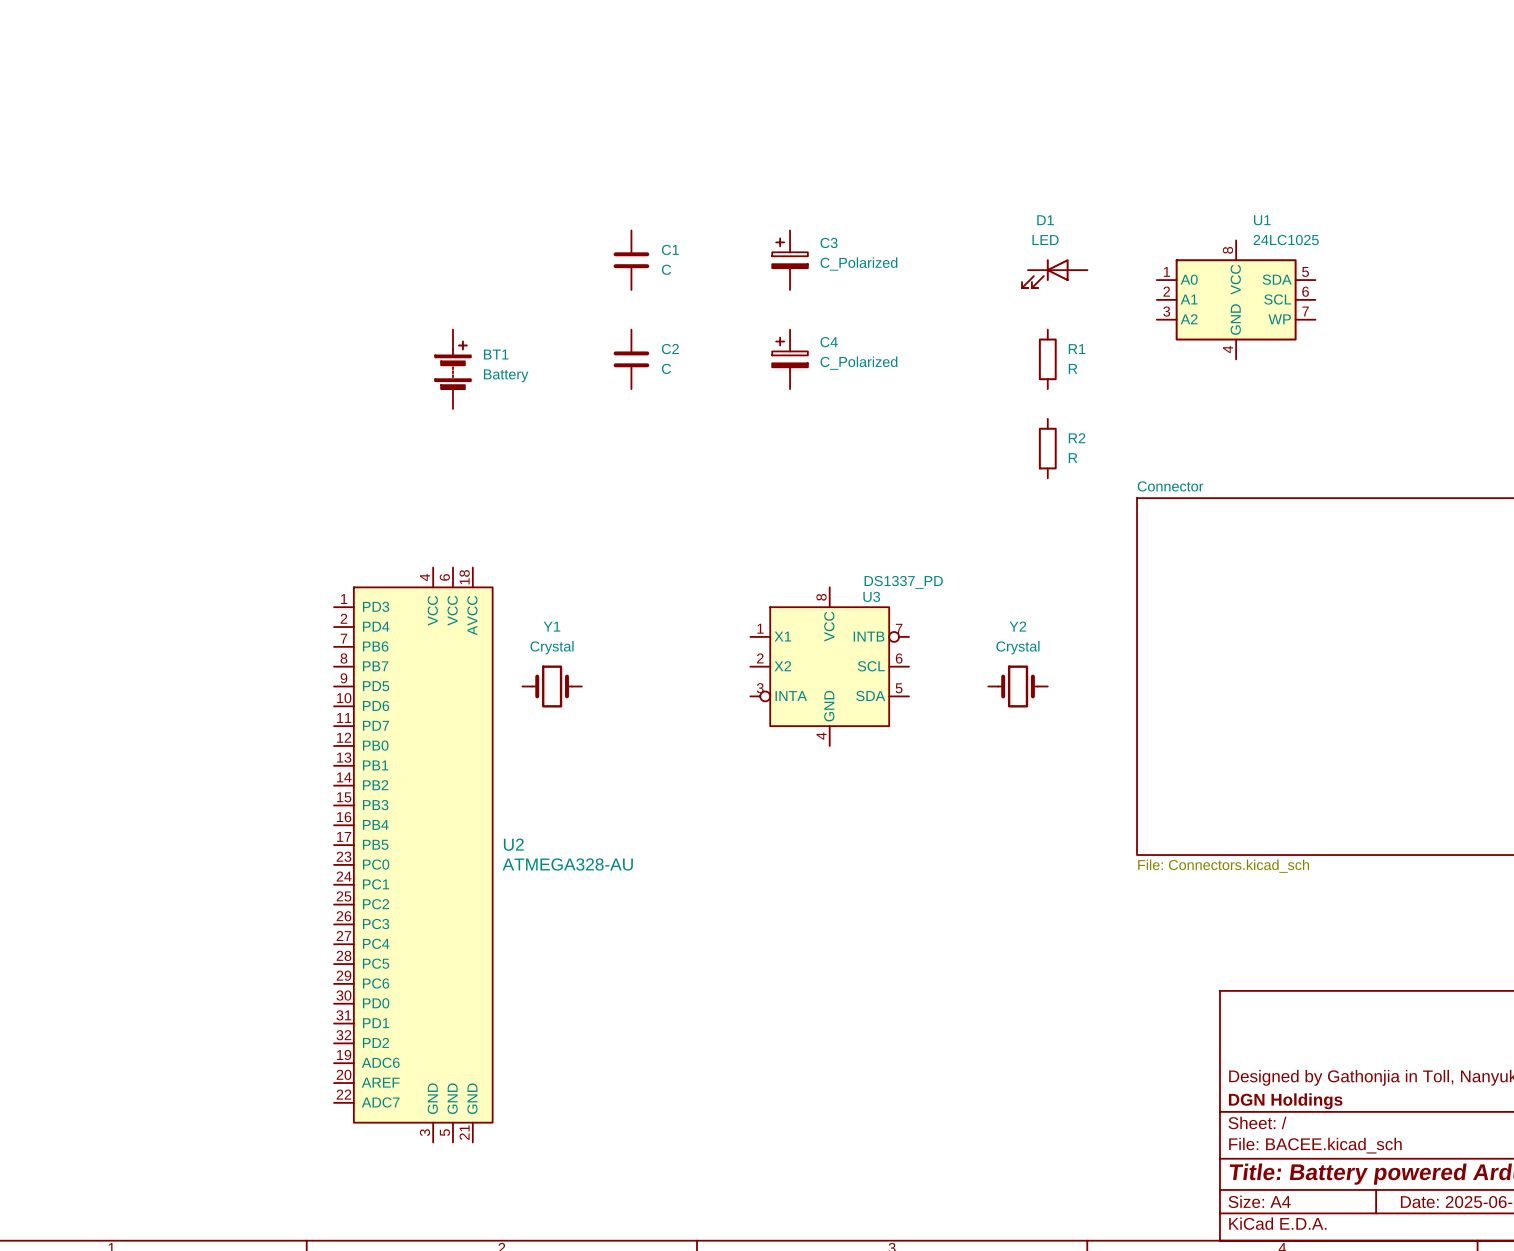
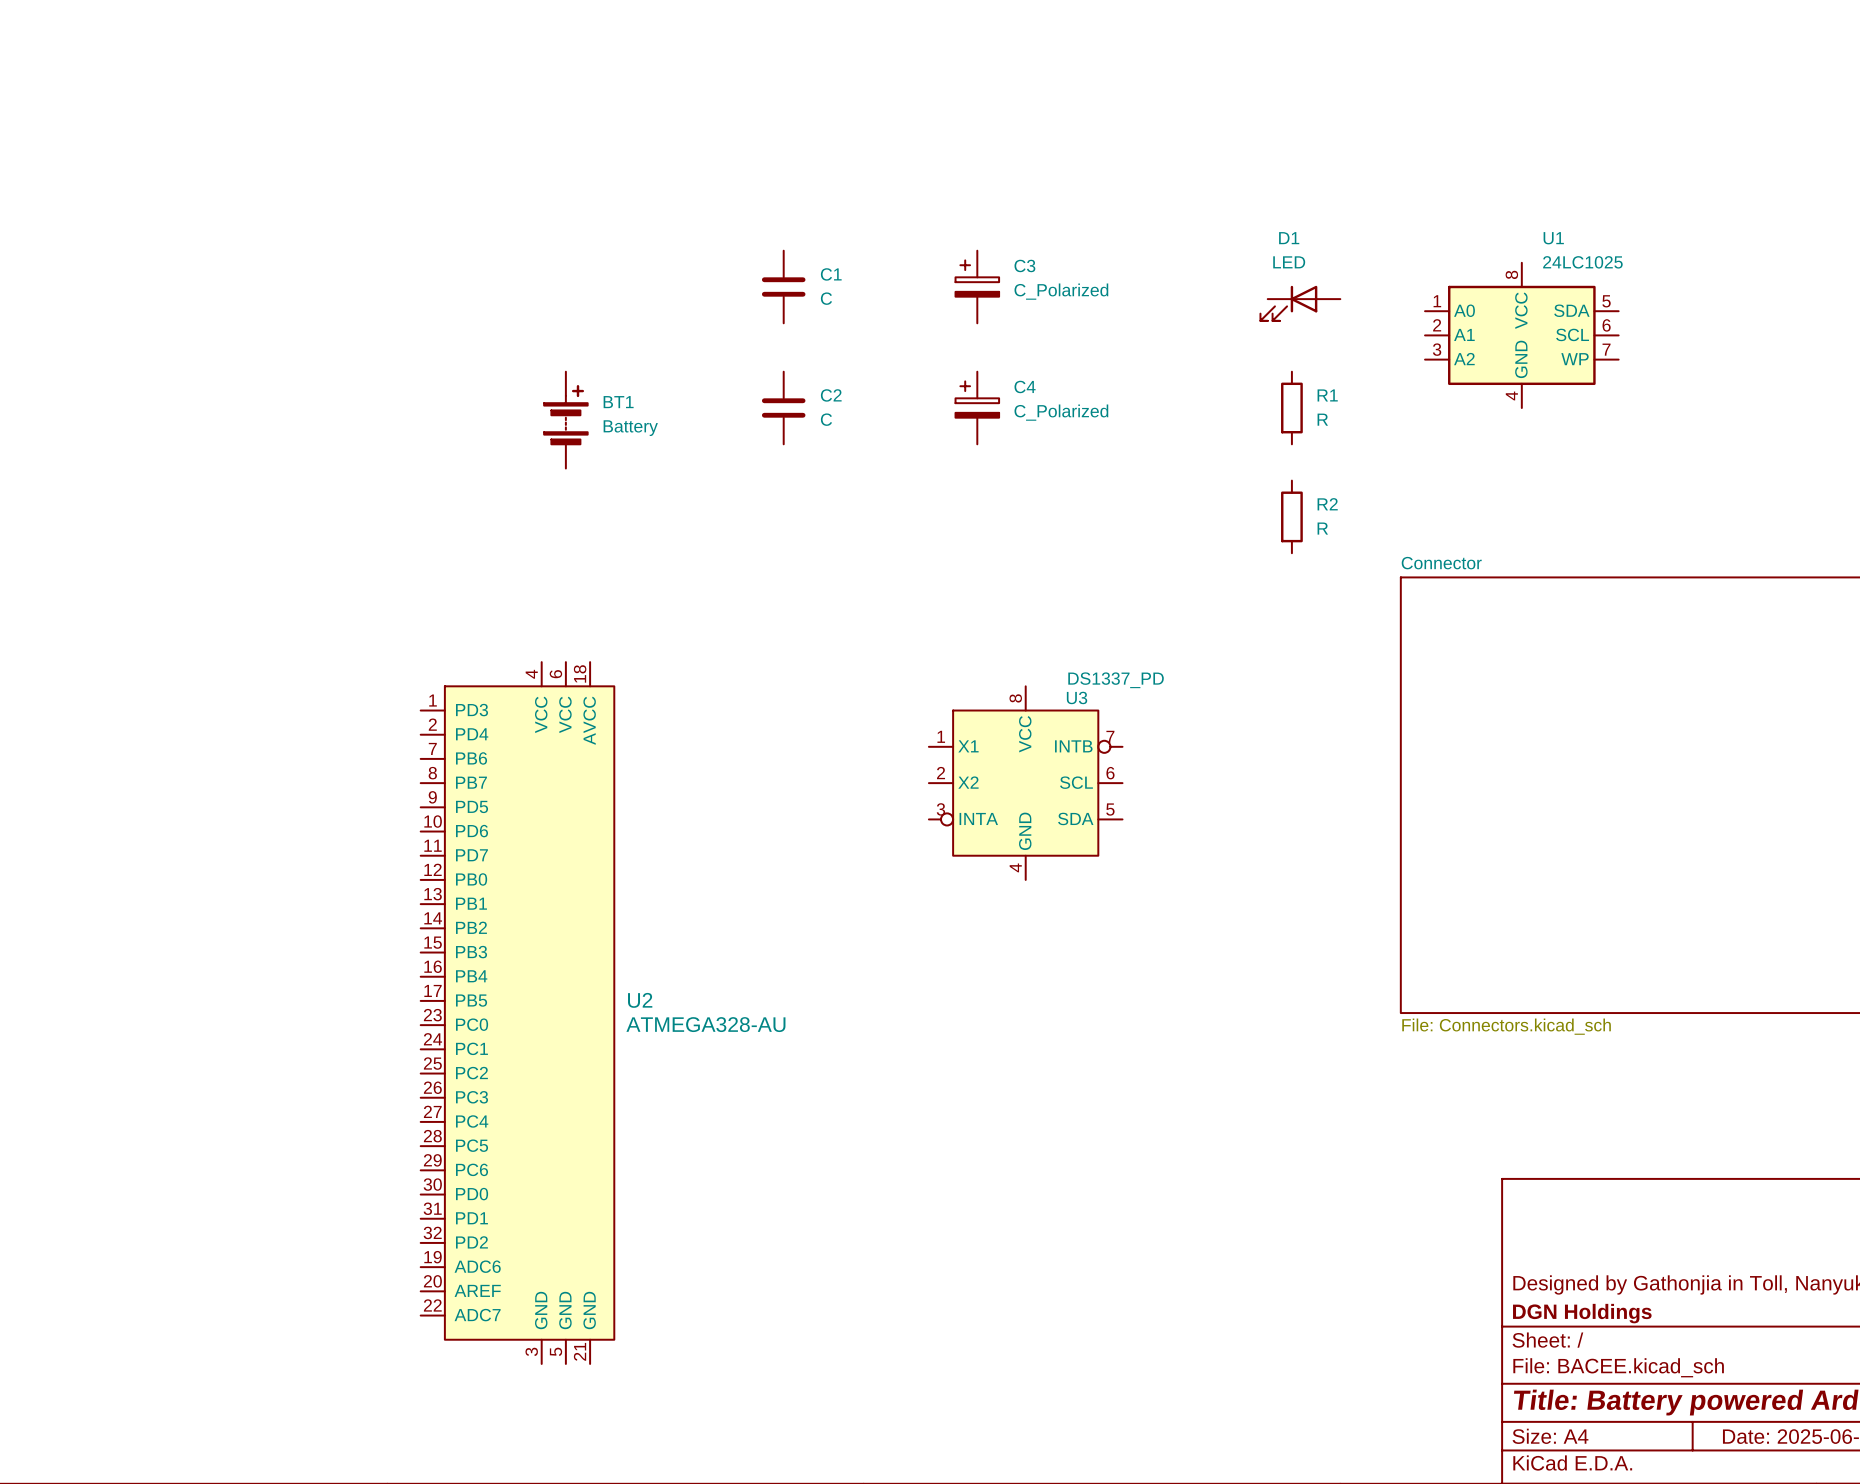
Y1: Crystal (552, 686) -> none
Y2: Crystal (1018, 686) -> none

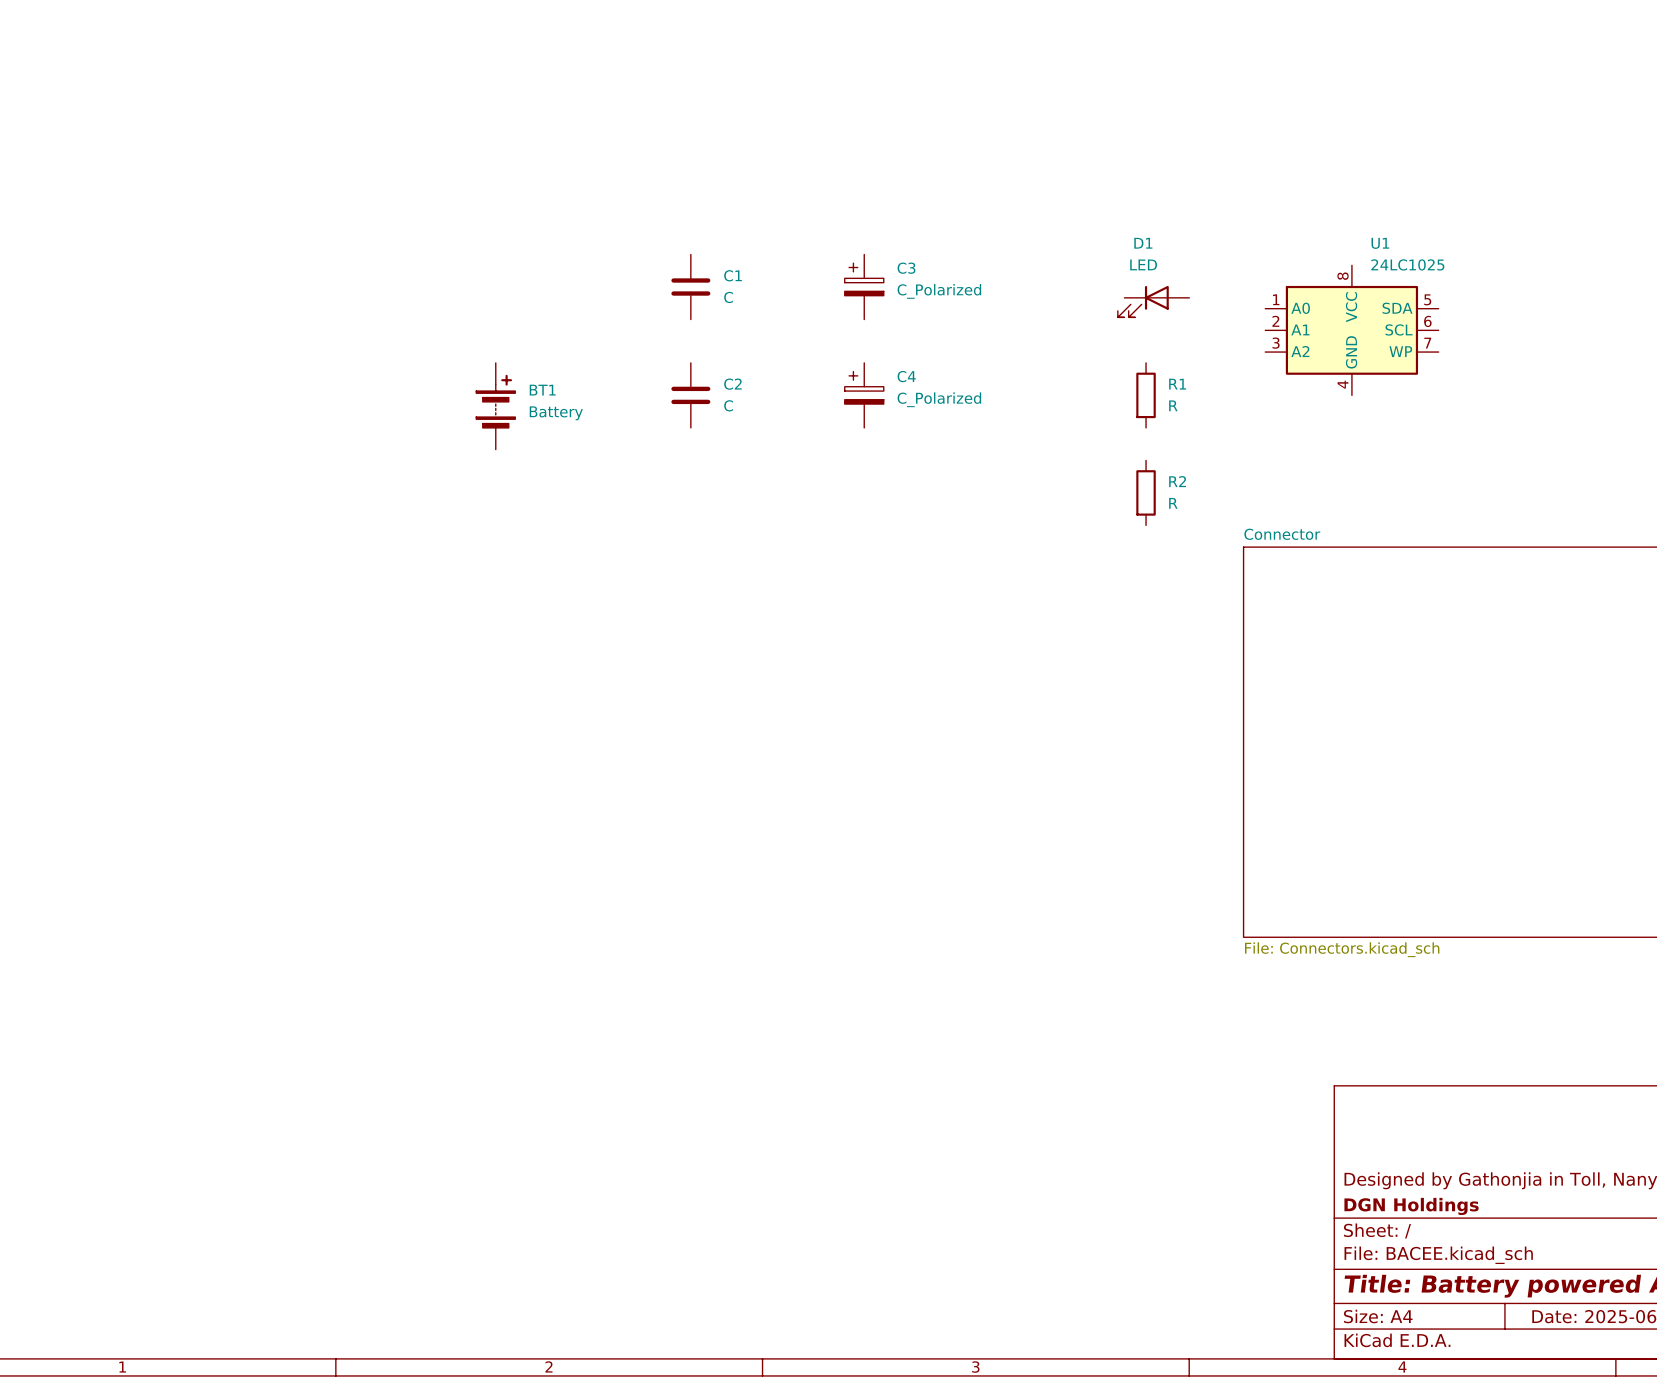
U3: DS1337_PD (1025, 783) -> none
U2: ATMEGA328-AU (517, 1013) -> none

